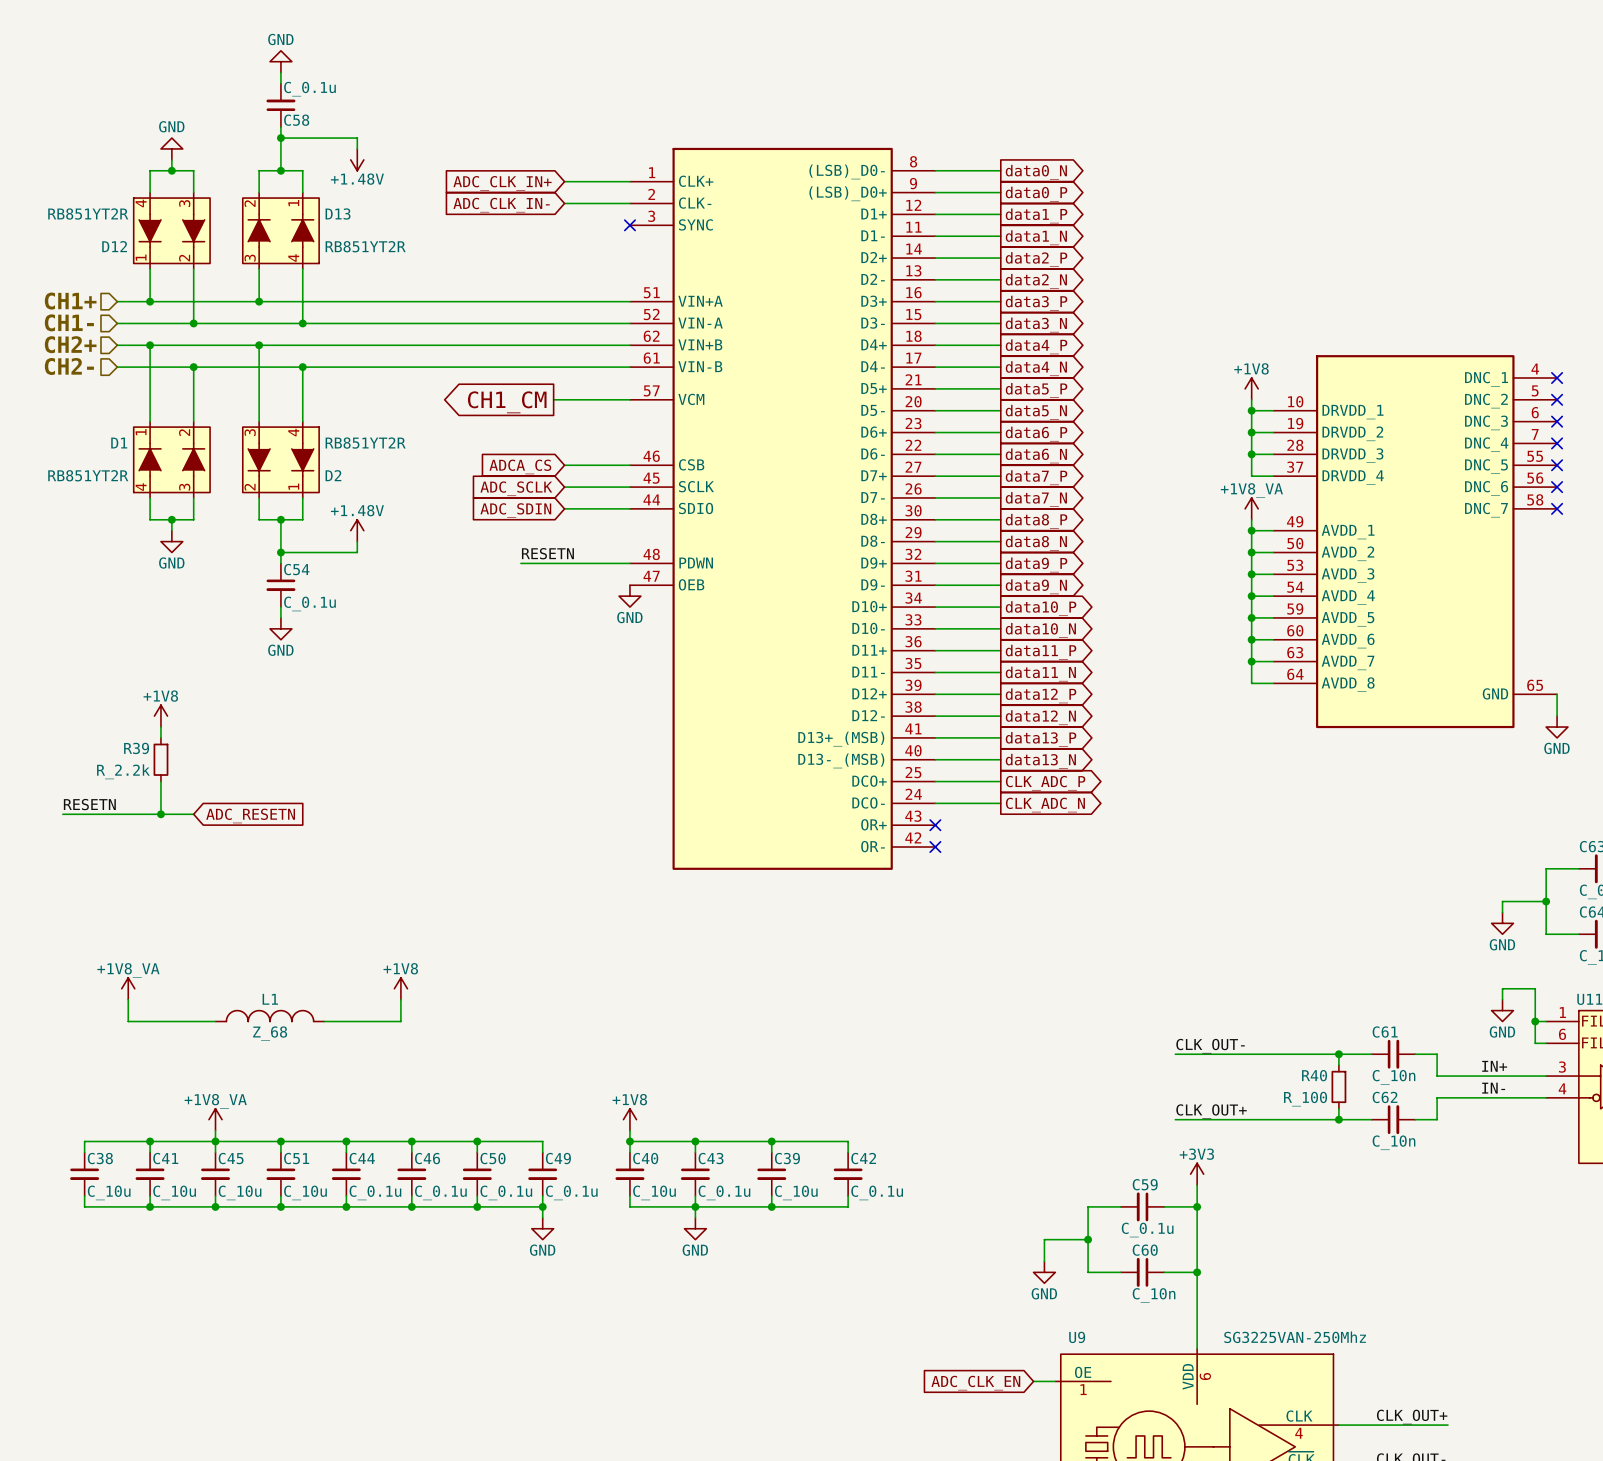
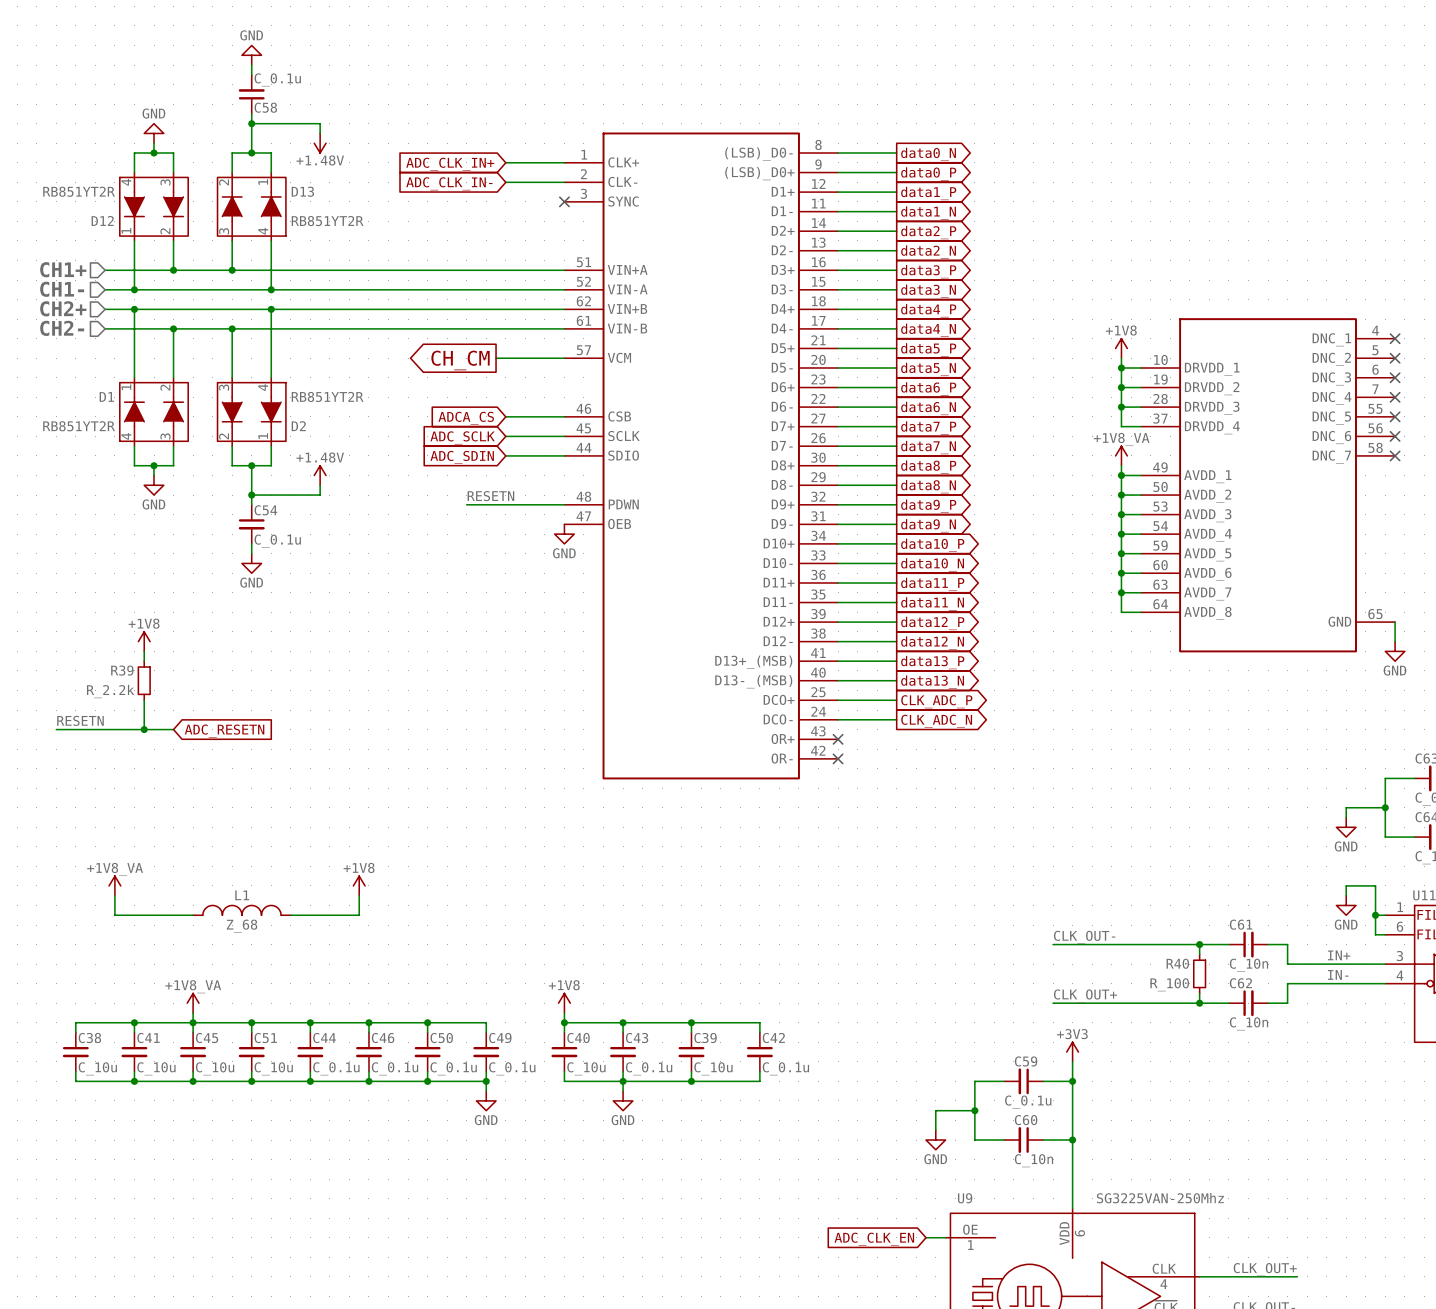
junction: (150, 301) -> none
wire: (193, 301) (193, 323) -> (134, 270) (134, 289)
junction: none -> (173, 270)
junction: none -> (134, 289)
junction: (193, 323) -> none
wire: (259, 345) (259, 367) -> (271, 309) (271, 328)
junction: (259, 345) -> none
junction: none -> (271, 309)
junction: none -> (232, 328)
junction: (302, 367) -> none
global label: CH1_CM (507, 402) -> CH_CM (460, 360)

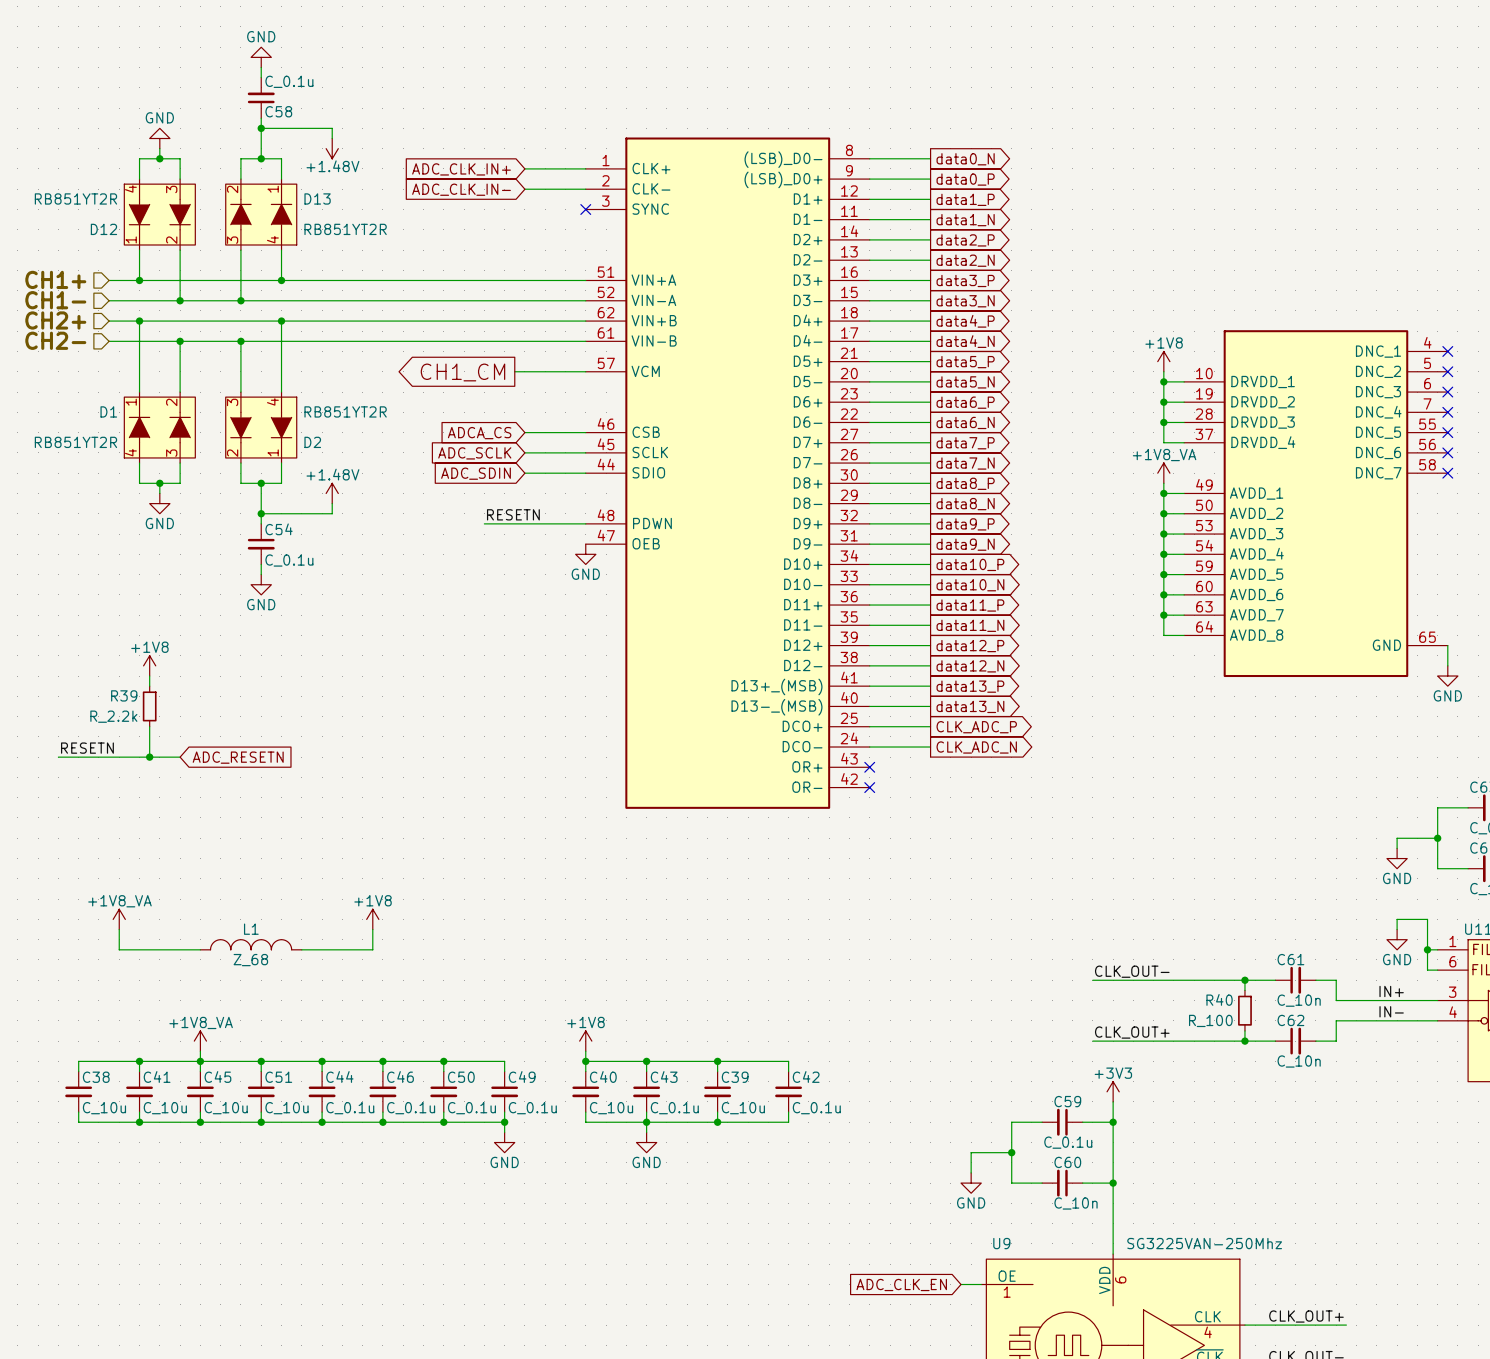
wire: (134, 270) (134, 289) -> (180, 280) (180, 300)
junction: none -> (139, 280)
junction: (173, 270) -> none
junction: (232, 270) -> none
wire: (271, 270) (271, 289) -> (240, 280) (240, 300)
junction: none -> (281, 280)
junction: (134, 289) -> none
junction: none -> (180, 300)
junction: none -> (240, 300)
junction: (271, 289) -> none
global label: CH_CM (460, 360) -> CH1_CM (462, 372)

